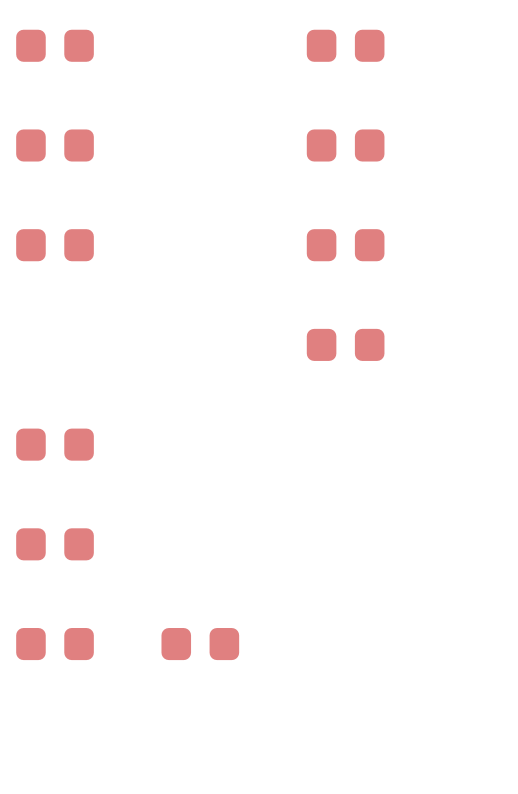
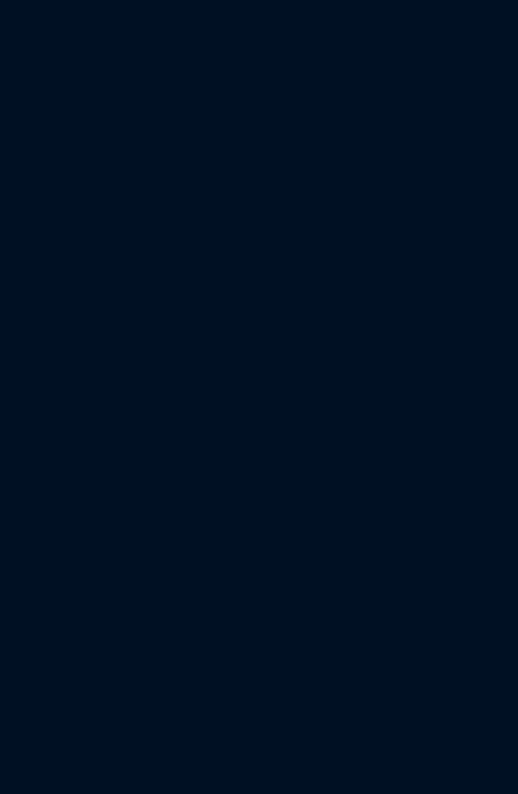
part: (55, 45) -> none
part: (345, 45) -> none
part: (55, 145) -> none
part: (345, 145) -> none
part: (55, 245) -> none
part: (345, 245) -> none
part: (345, 344) -> none
part: (55, 444) -> none
part: (55, 544) -> none
part: (55, 644) -> none
part: (200, 644) -> none

